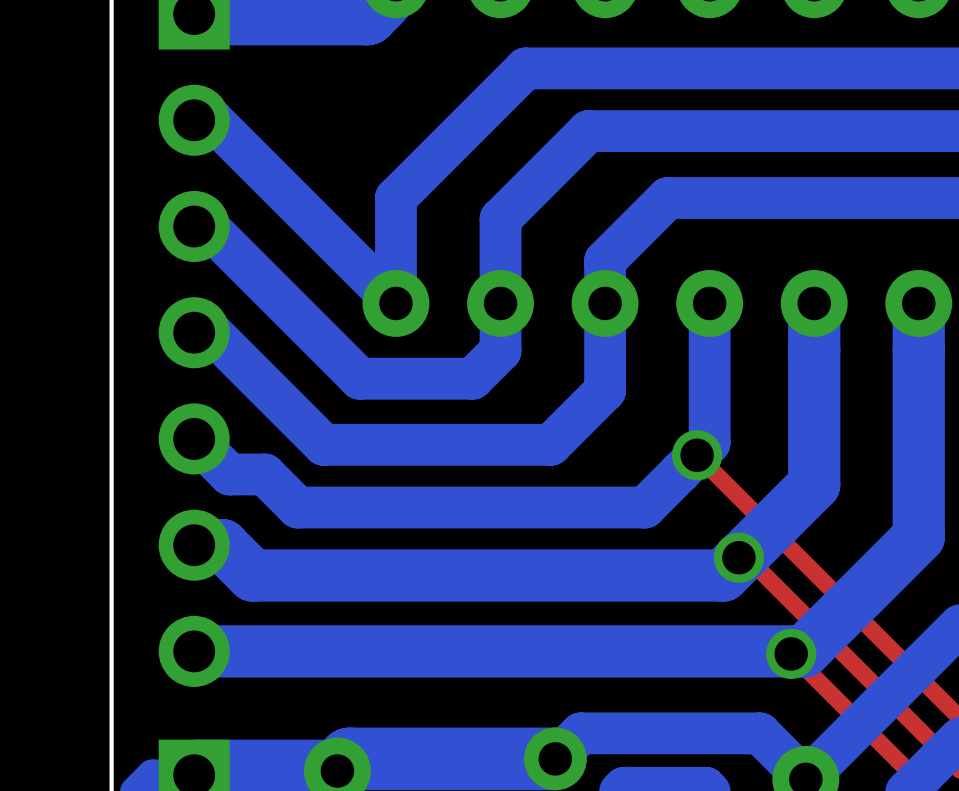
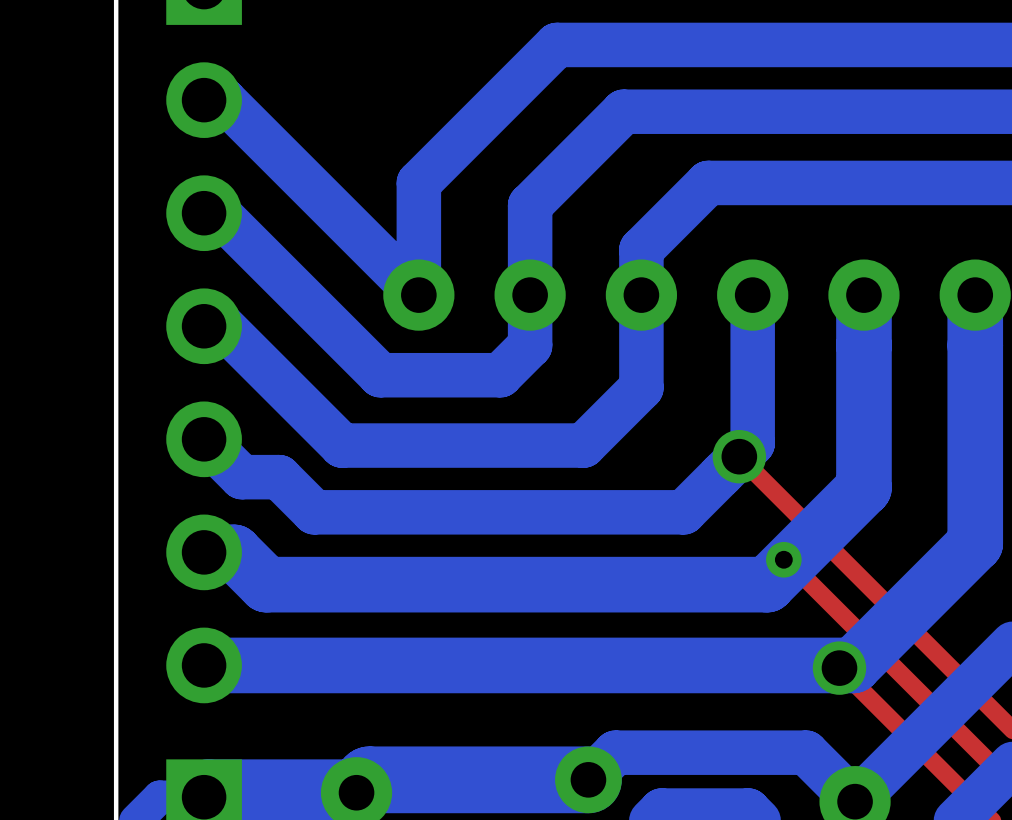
via size: [713, 532, 765, 583] -> [766, 541, 802, 578]

